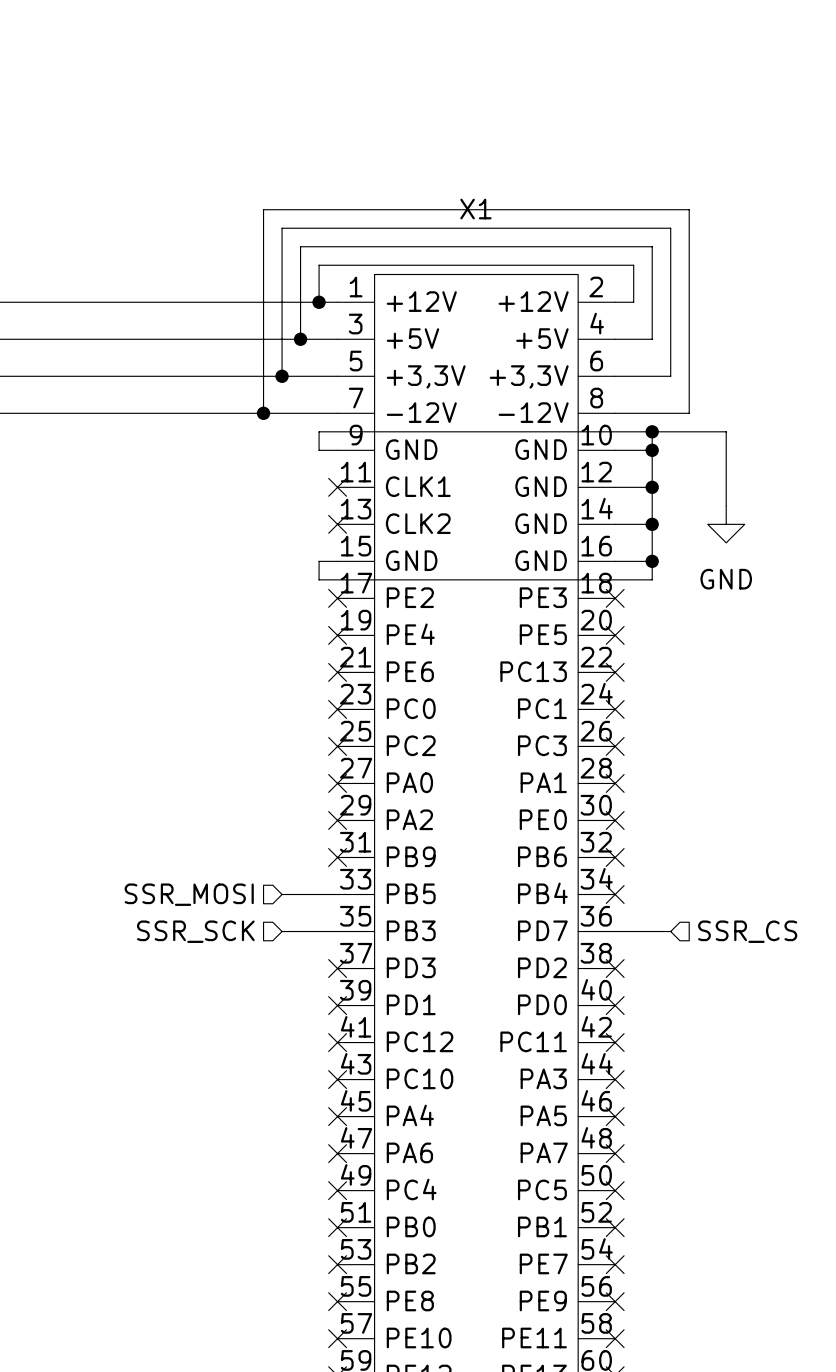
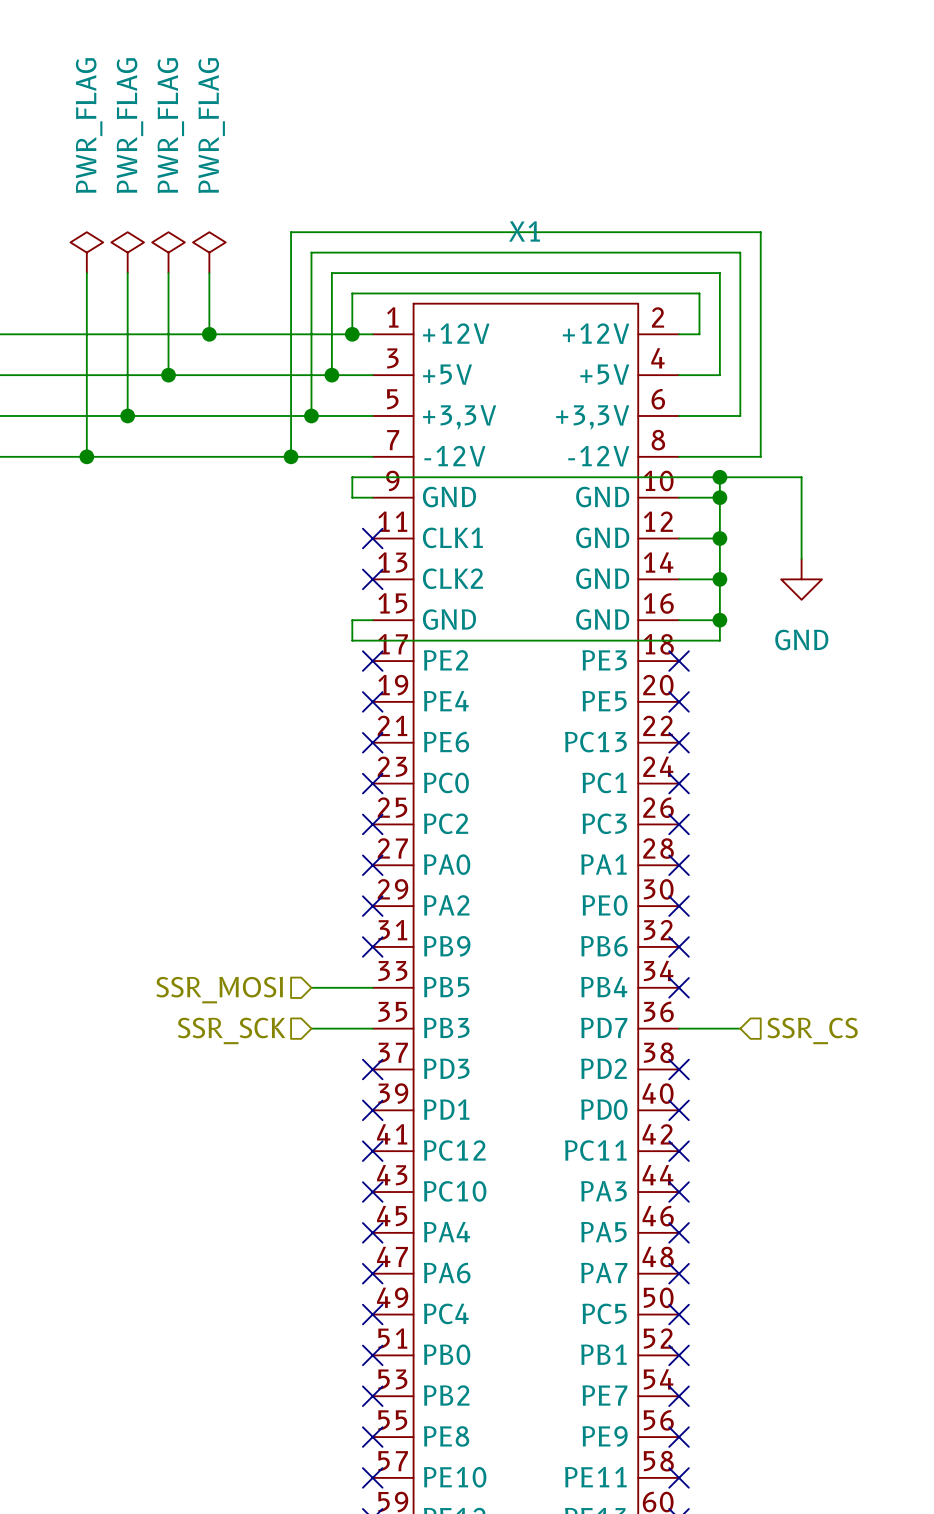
power symbol: none -> PWR_FLAG (86, 252)
power symbol: none -> PWR_FLAG (127, 252)
power symbol: none -> PWR_FLAG (168, 252)
power symbol: none -> PWR_FLAG (209, 252)
wire: none -> (86, 273) (86, 456)
wire: none -> (127, 273) (127, 415)
wire: none -> (168, 273) (168, 375)
wire: none -> (209, 273) (209, 334)
junction: none -> (209, 334)
junction: none -> (168, 375)
junction: none -> (127, 415)
junction: none -> (86, 456)

